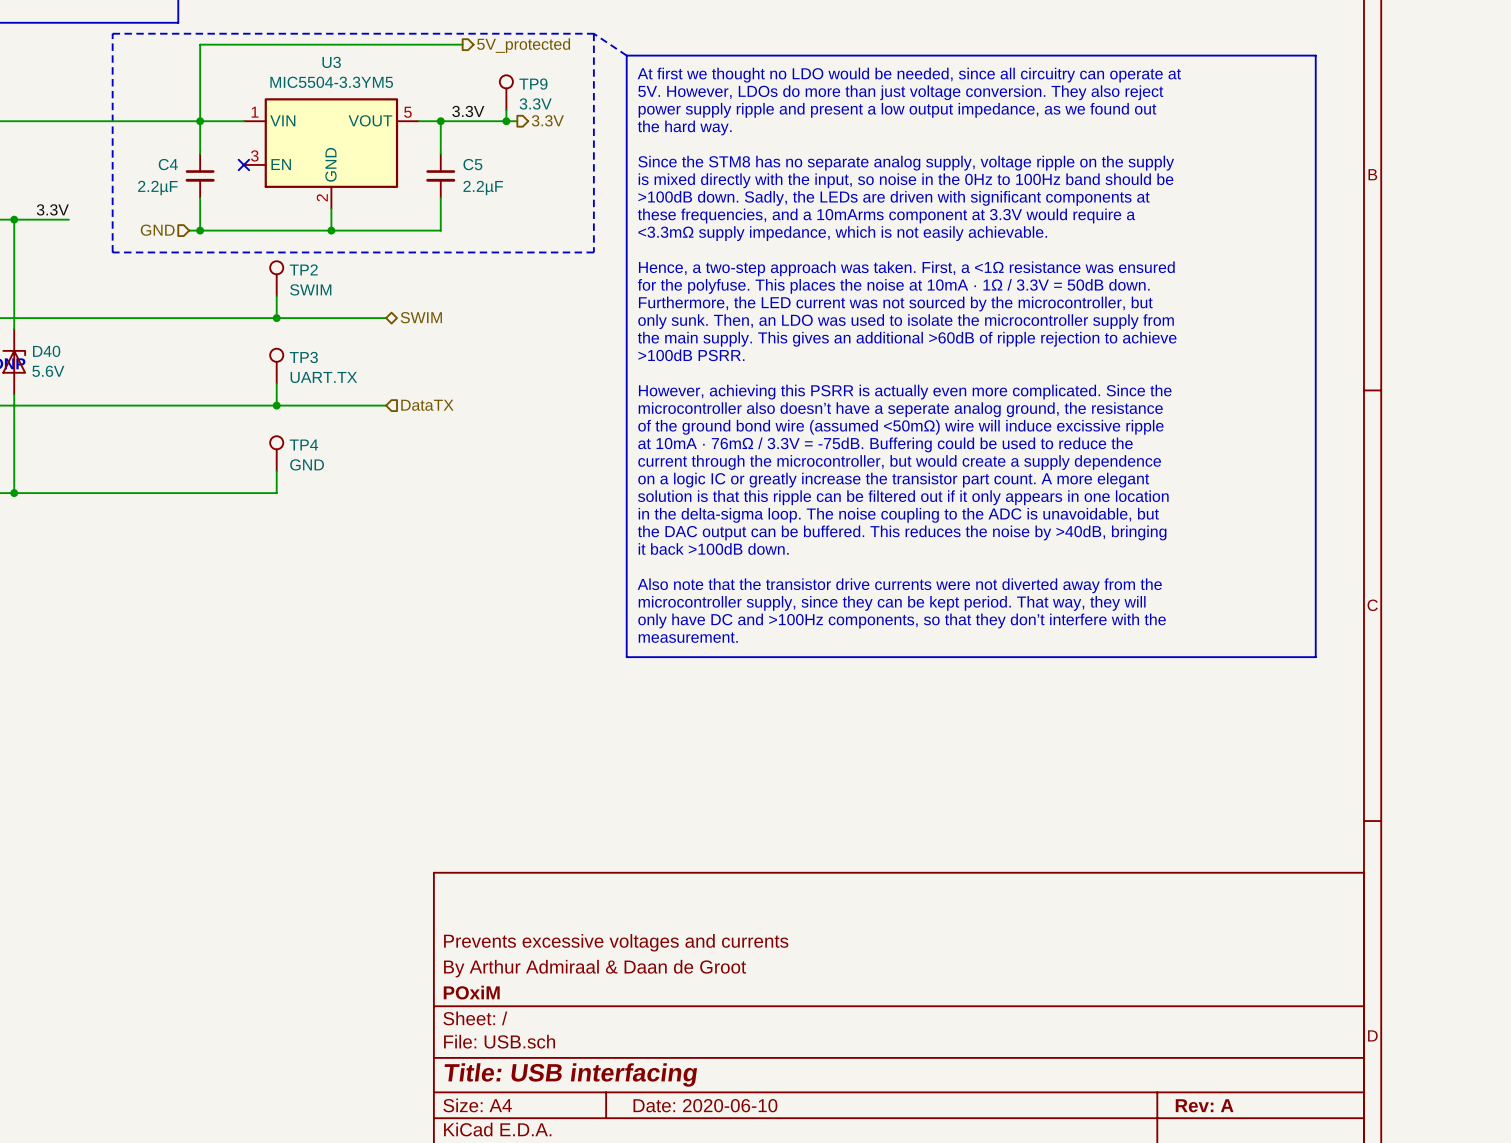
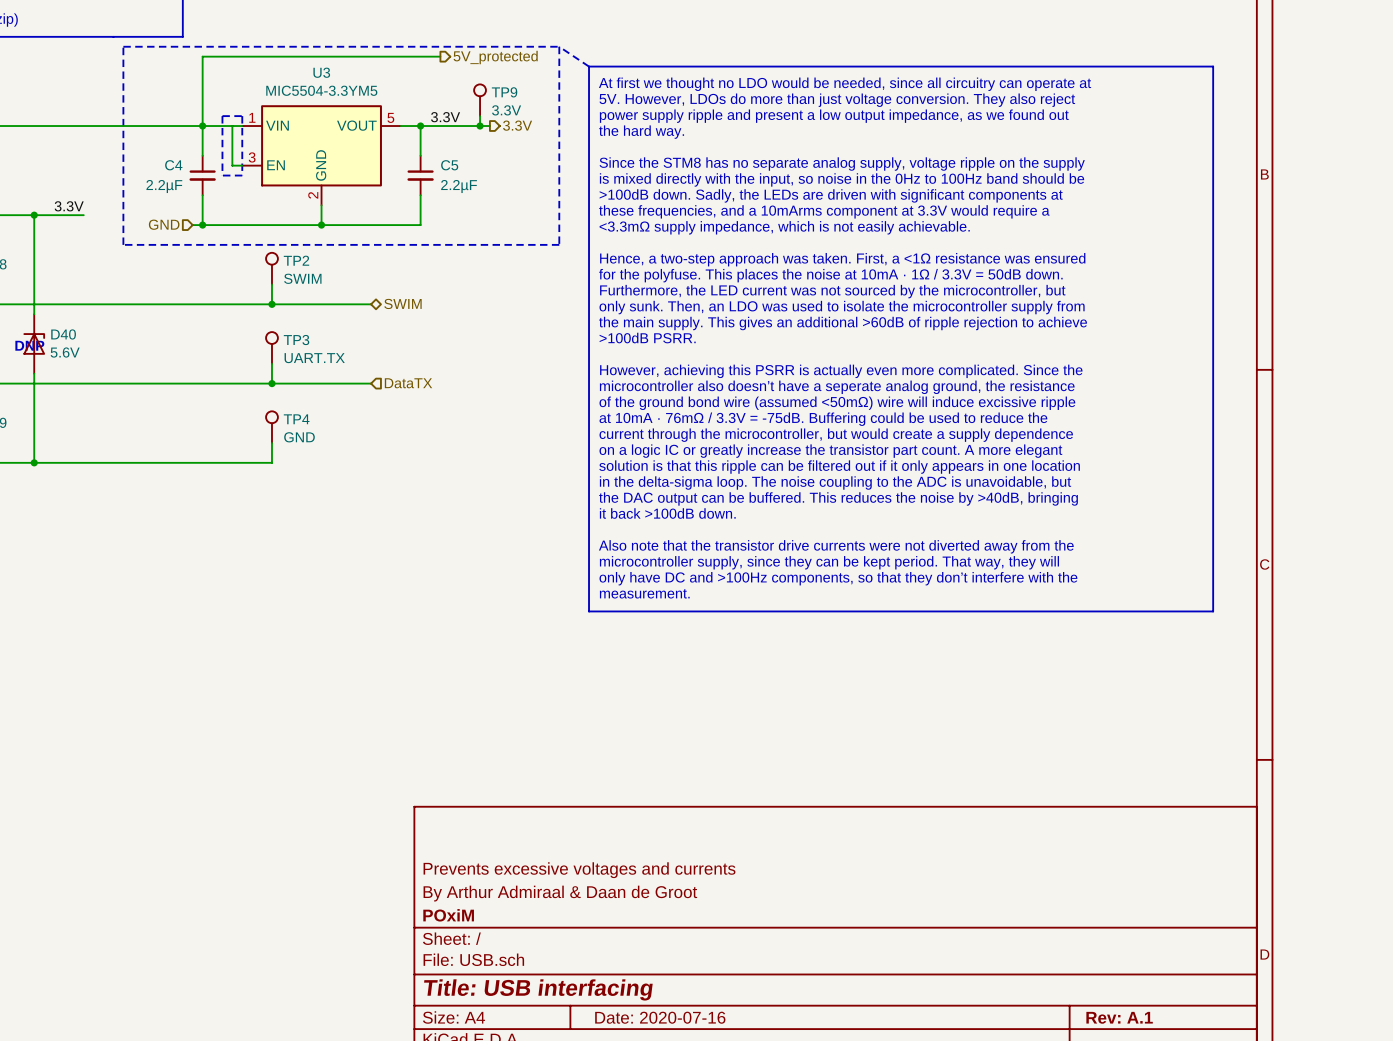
line: none -> (222, 116) (242, 116) (242, 175) (222, 175) (222, 116)
wire: none -> (232, 126) (232, 165) (242, 165)
no-connect mark: (243, 164) -> none
title block: Date: 2020-06-10 (705, 1105) -> Date: 2020-07-16 (660, 1017)
title block: Rev: A (1204, 1105) -> Rev: A.1 (1119, 1017)

